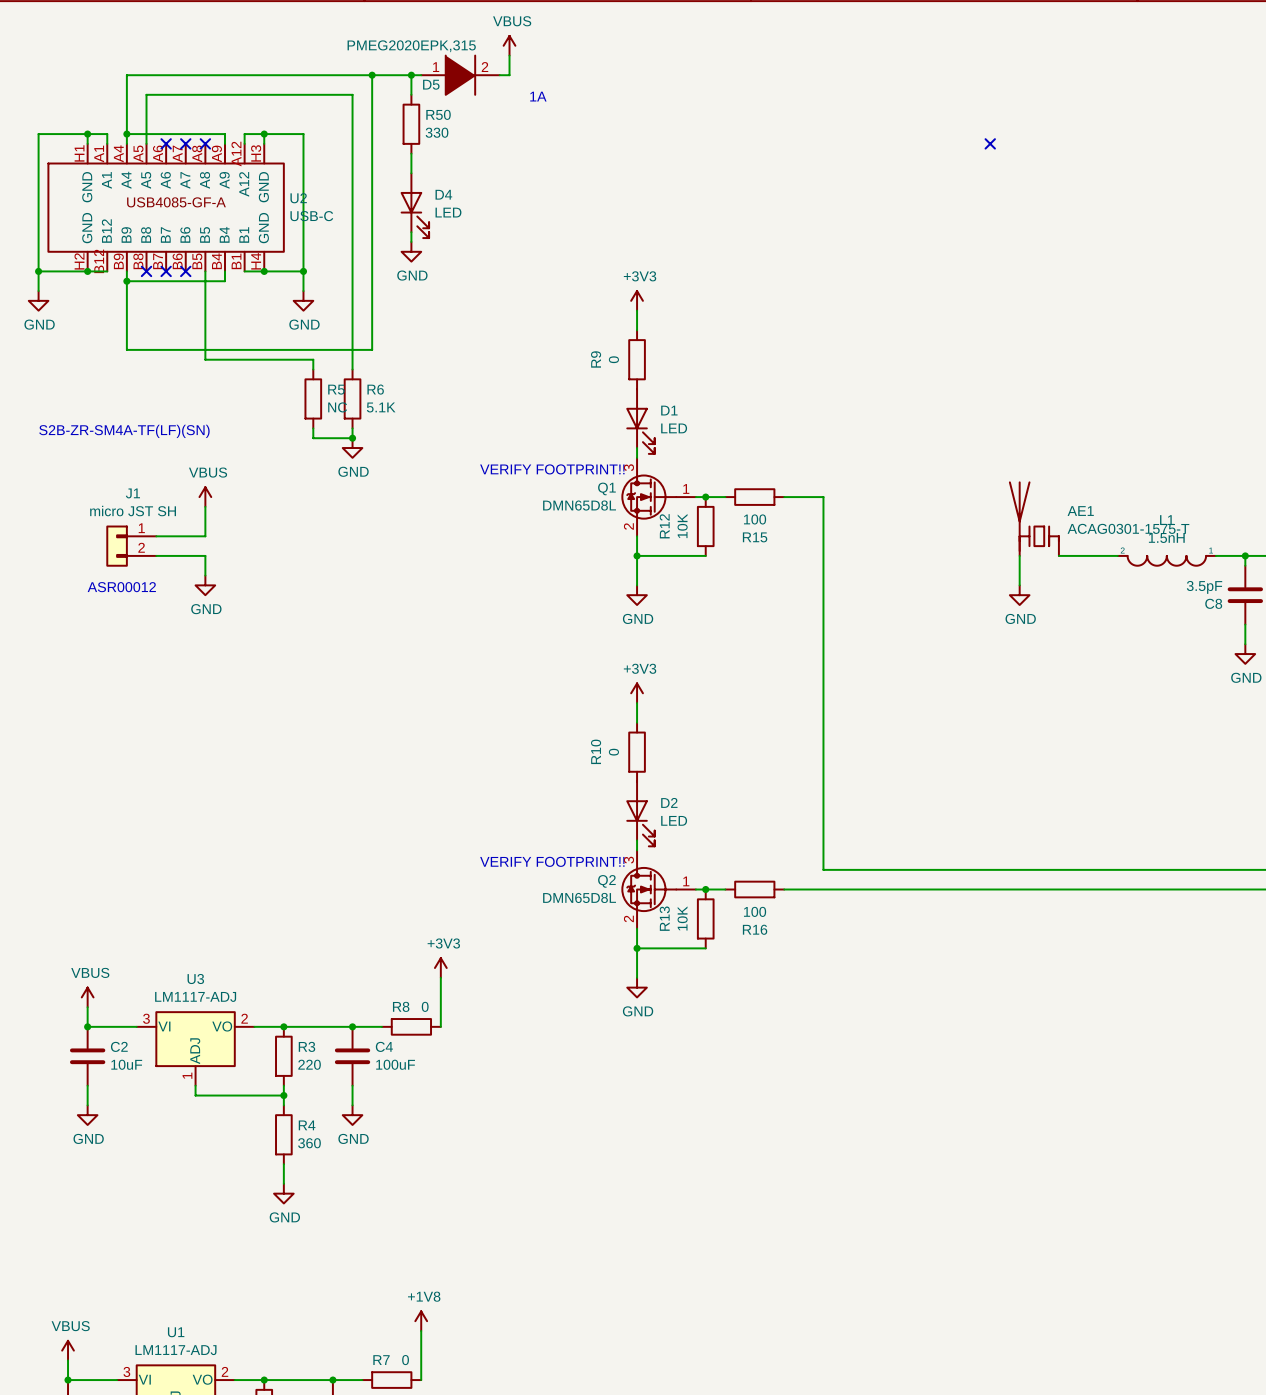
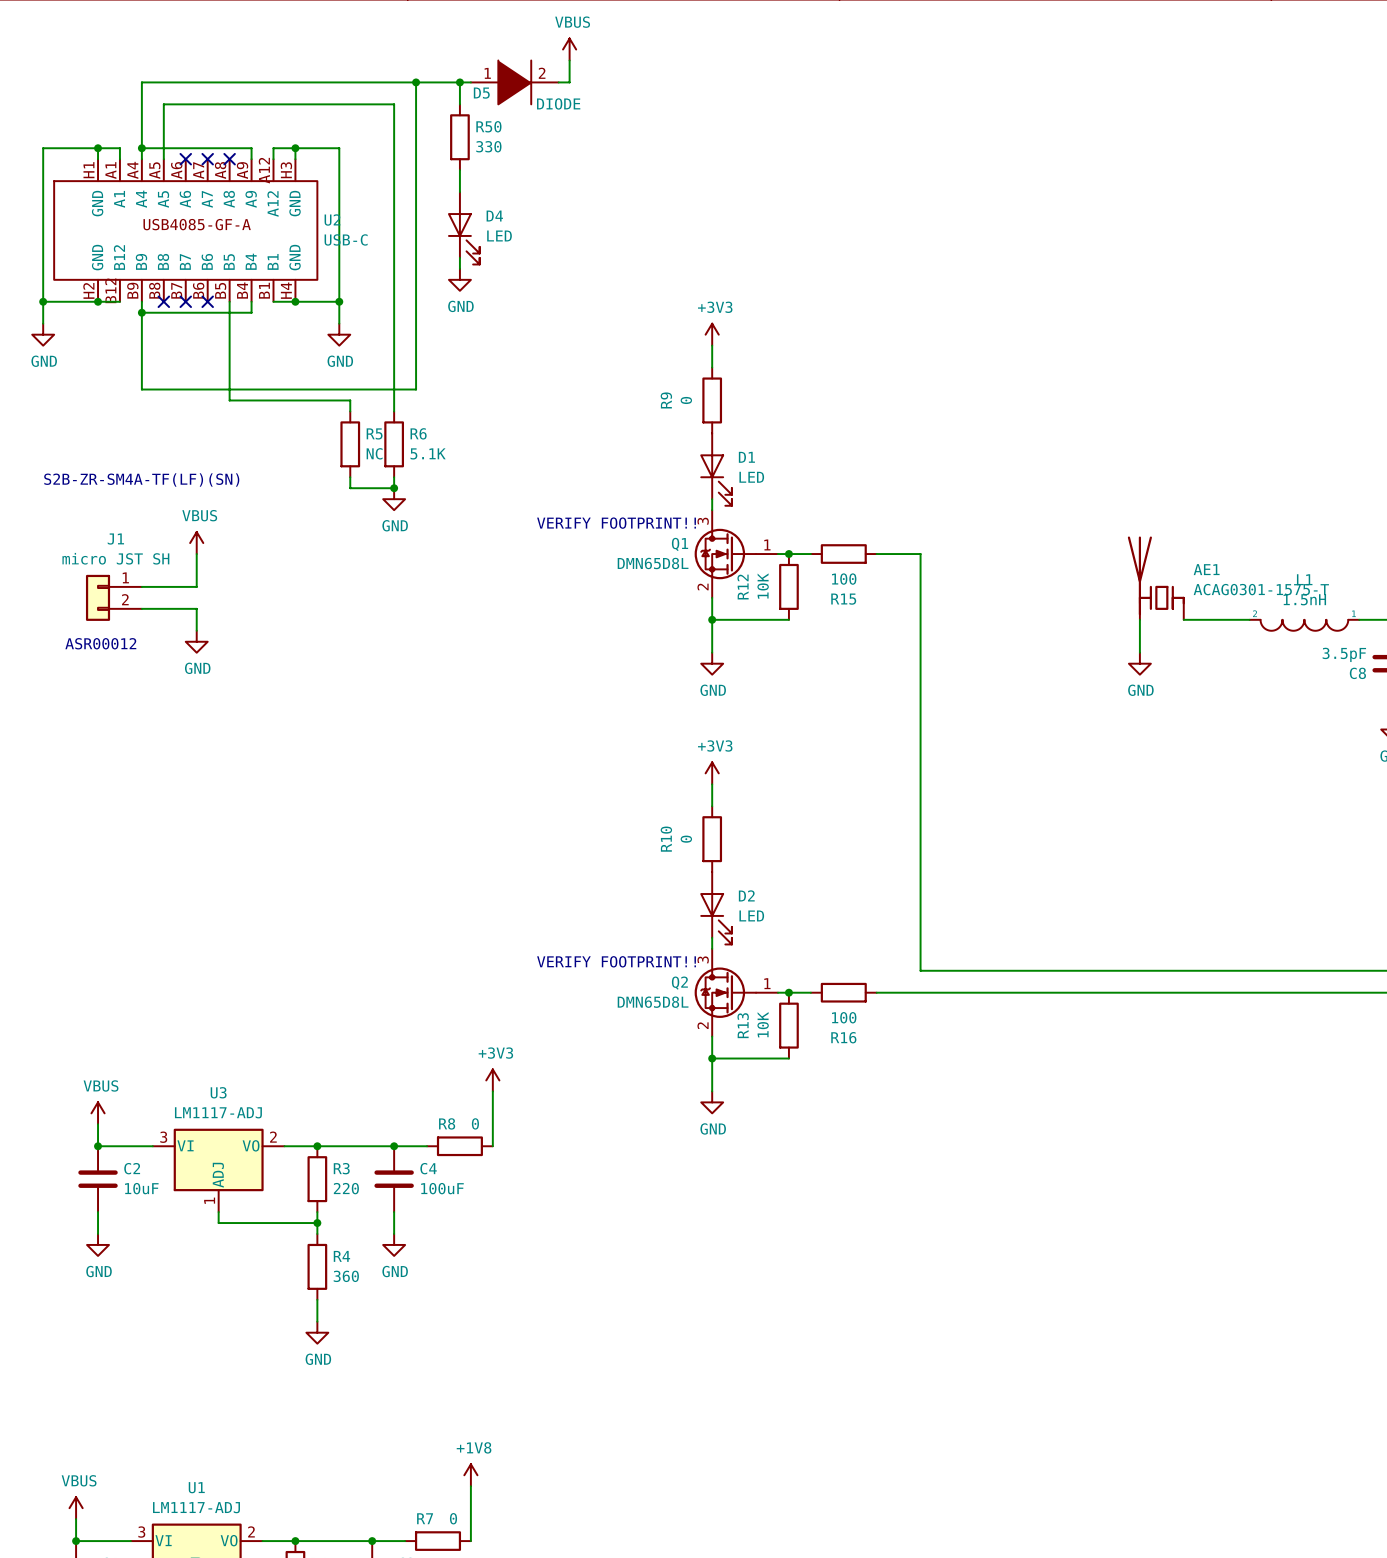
D5 value: PMEG2020EPK,315 (411, 46) -> DIODE (558, 103)
text: 1A (538, 96) -> none
no-connect mark: (990, 143) -> none
power symbol position: VBUS (205, 497) -> VBUS (196, 543)
wire: (205, 506) (205, 536) (156, 536) -> (196, 554) (196, 586) (141, 586)
J1 position: (131, 546) -> (113, 597)
wire: (156, 555) (205, 555) (205, 575) -> (141, 608) (196, 608) (196, 630)
power symbol position: GND (205, 585) -> GND (196, 641)
text position: ASR00012 (121, 587) -> ASR00012 (100, 643)

